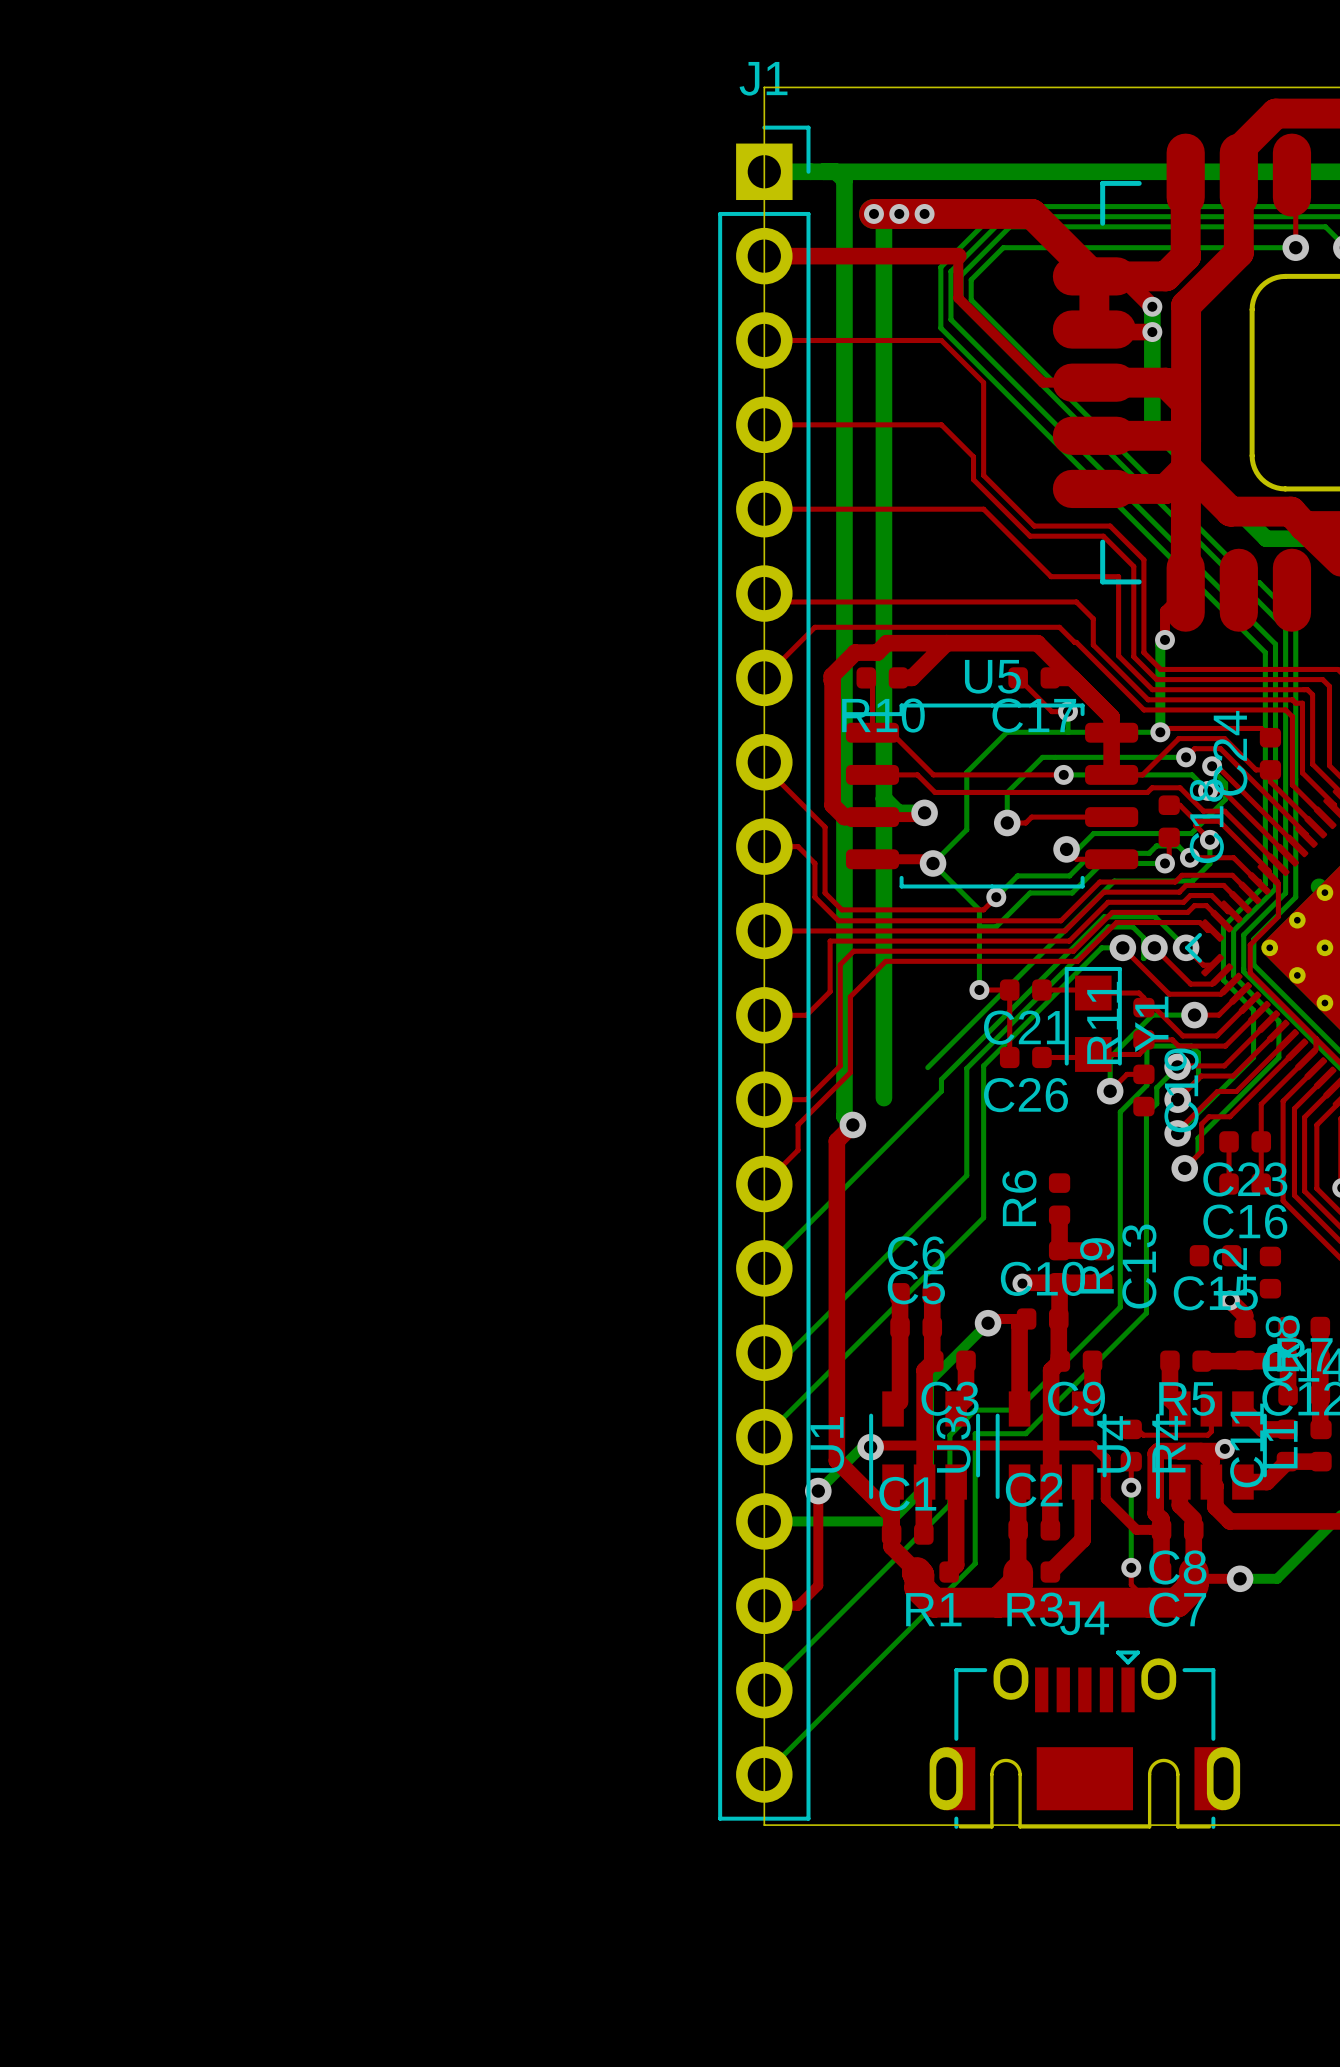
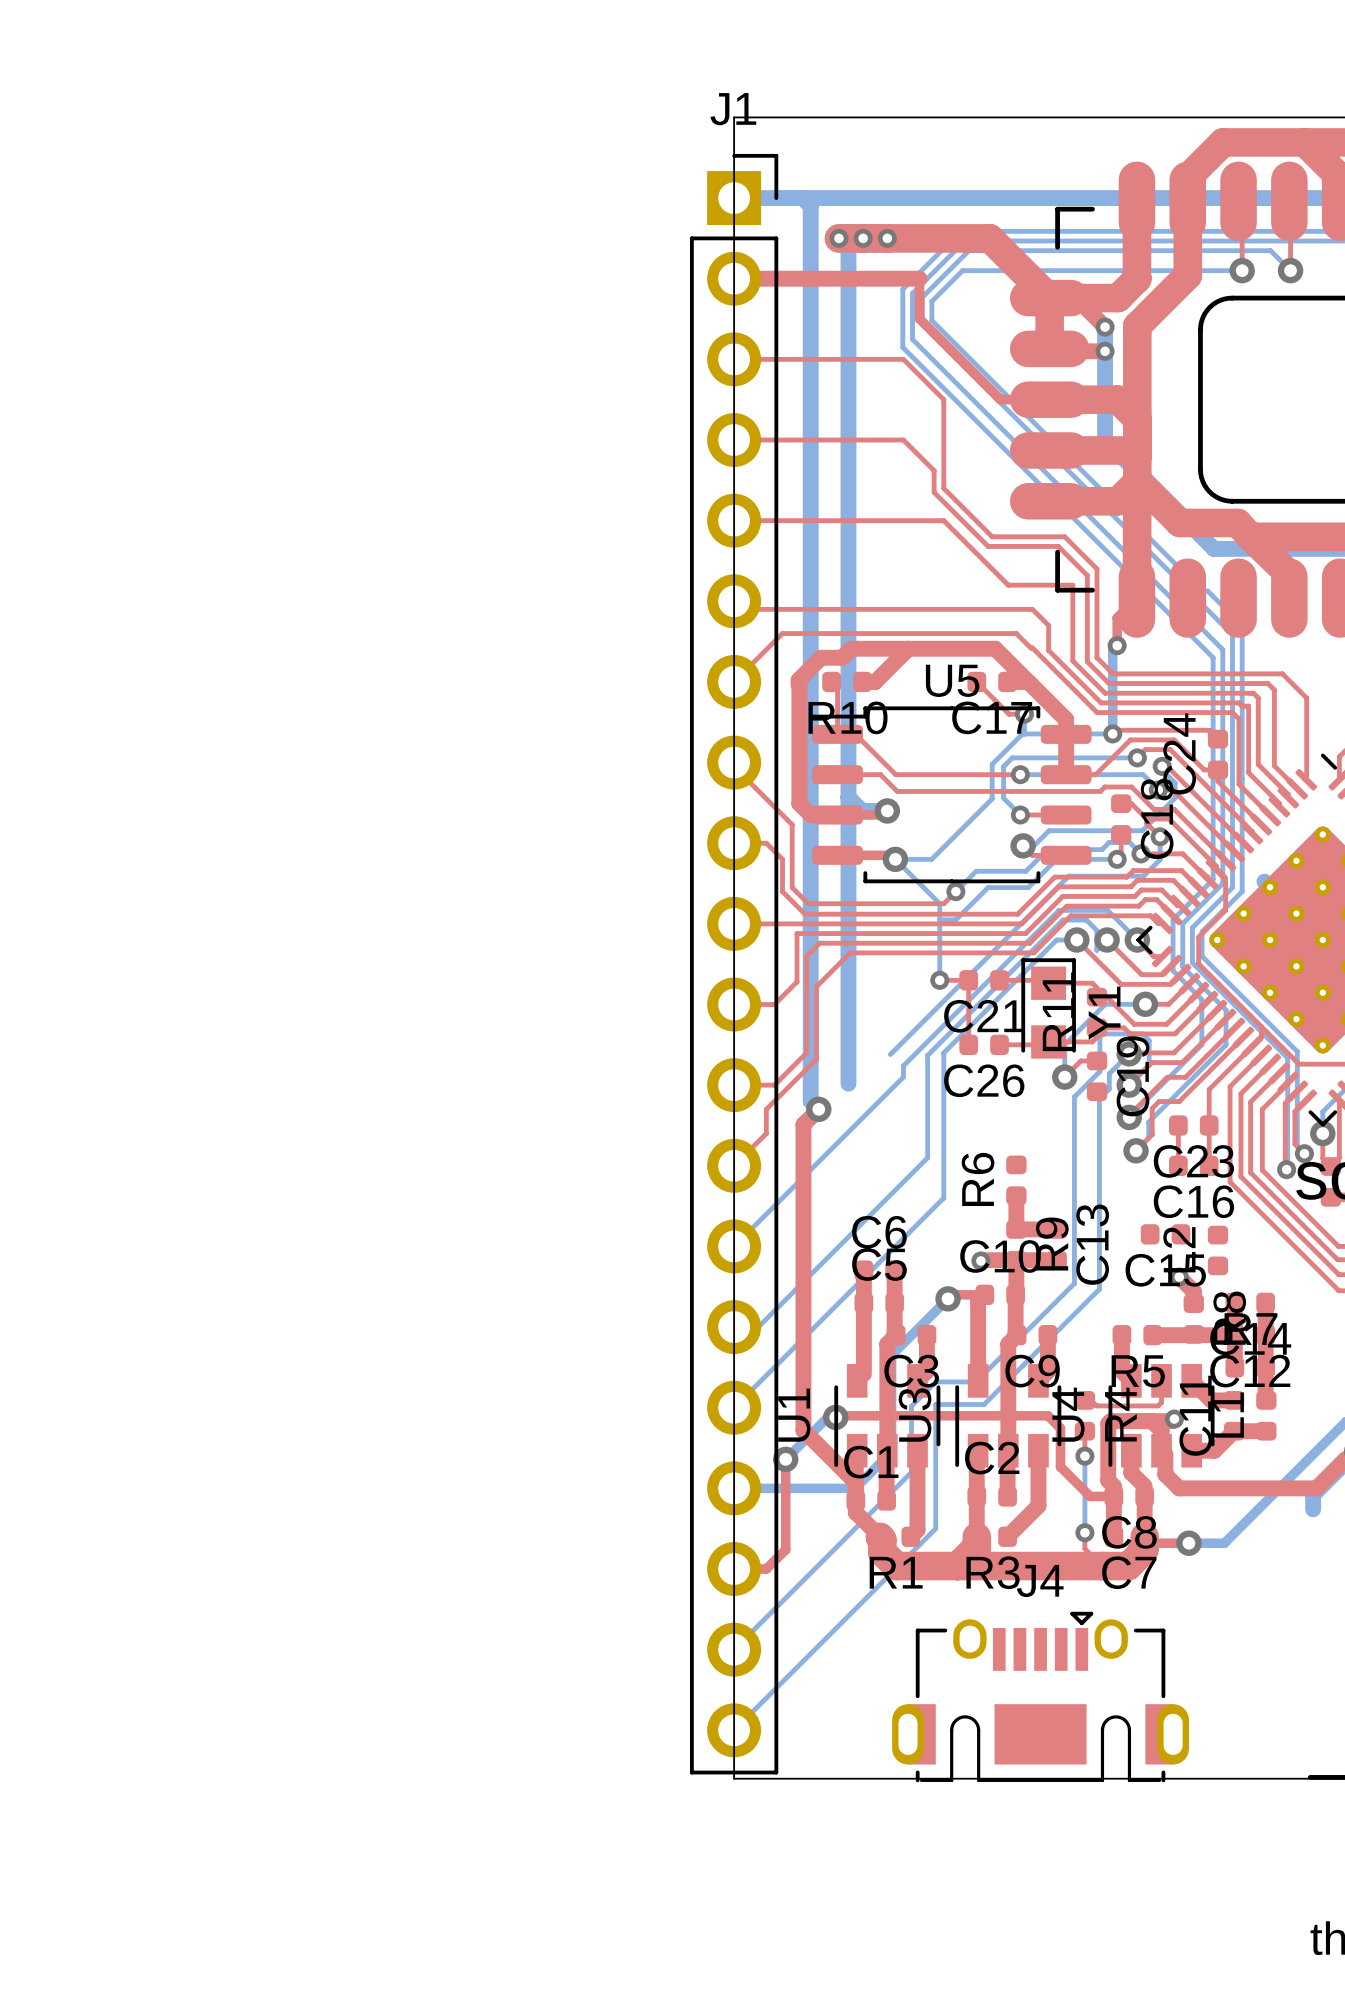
bottom track: (1066, 732) (1006, 732) (966, 772) (966, 829) (933, 863) -> (1022, 733) (992, 764) (992, 798) (931, 859) (895, 859)
bottom track: (1055, 757) (1042, 757) (1007, 792) (1007, 822) -> (1012, 757) (1003, 766) (1003, 798) (1020, 815)
top track: (1063, 817) (1031, 817) (1025, 822) (1007, 822) -> none
via: none -> (1020, 815)
via: (1007, 822) -> none

